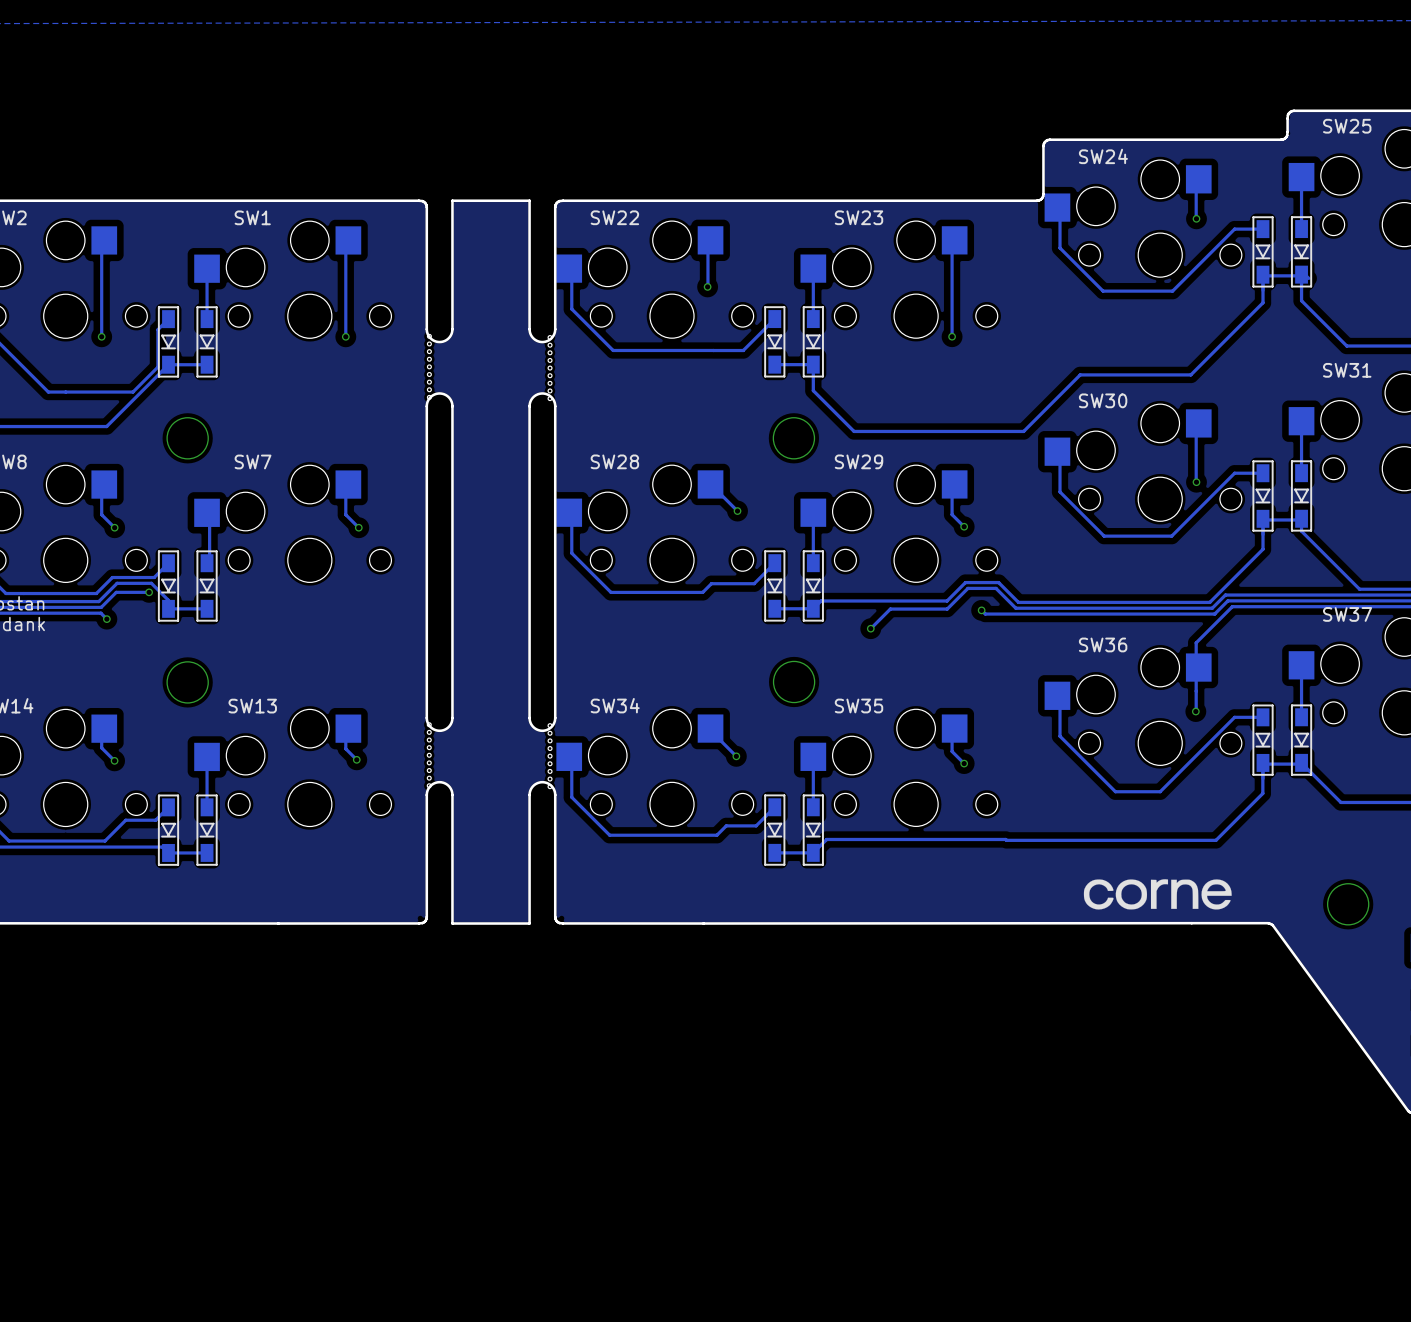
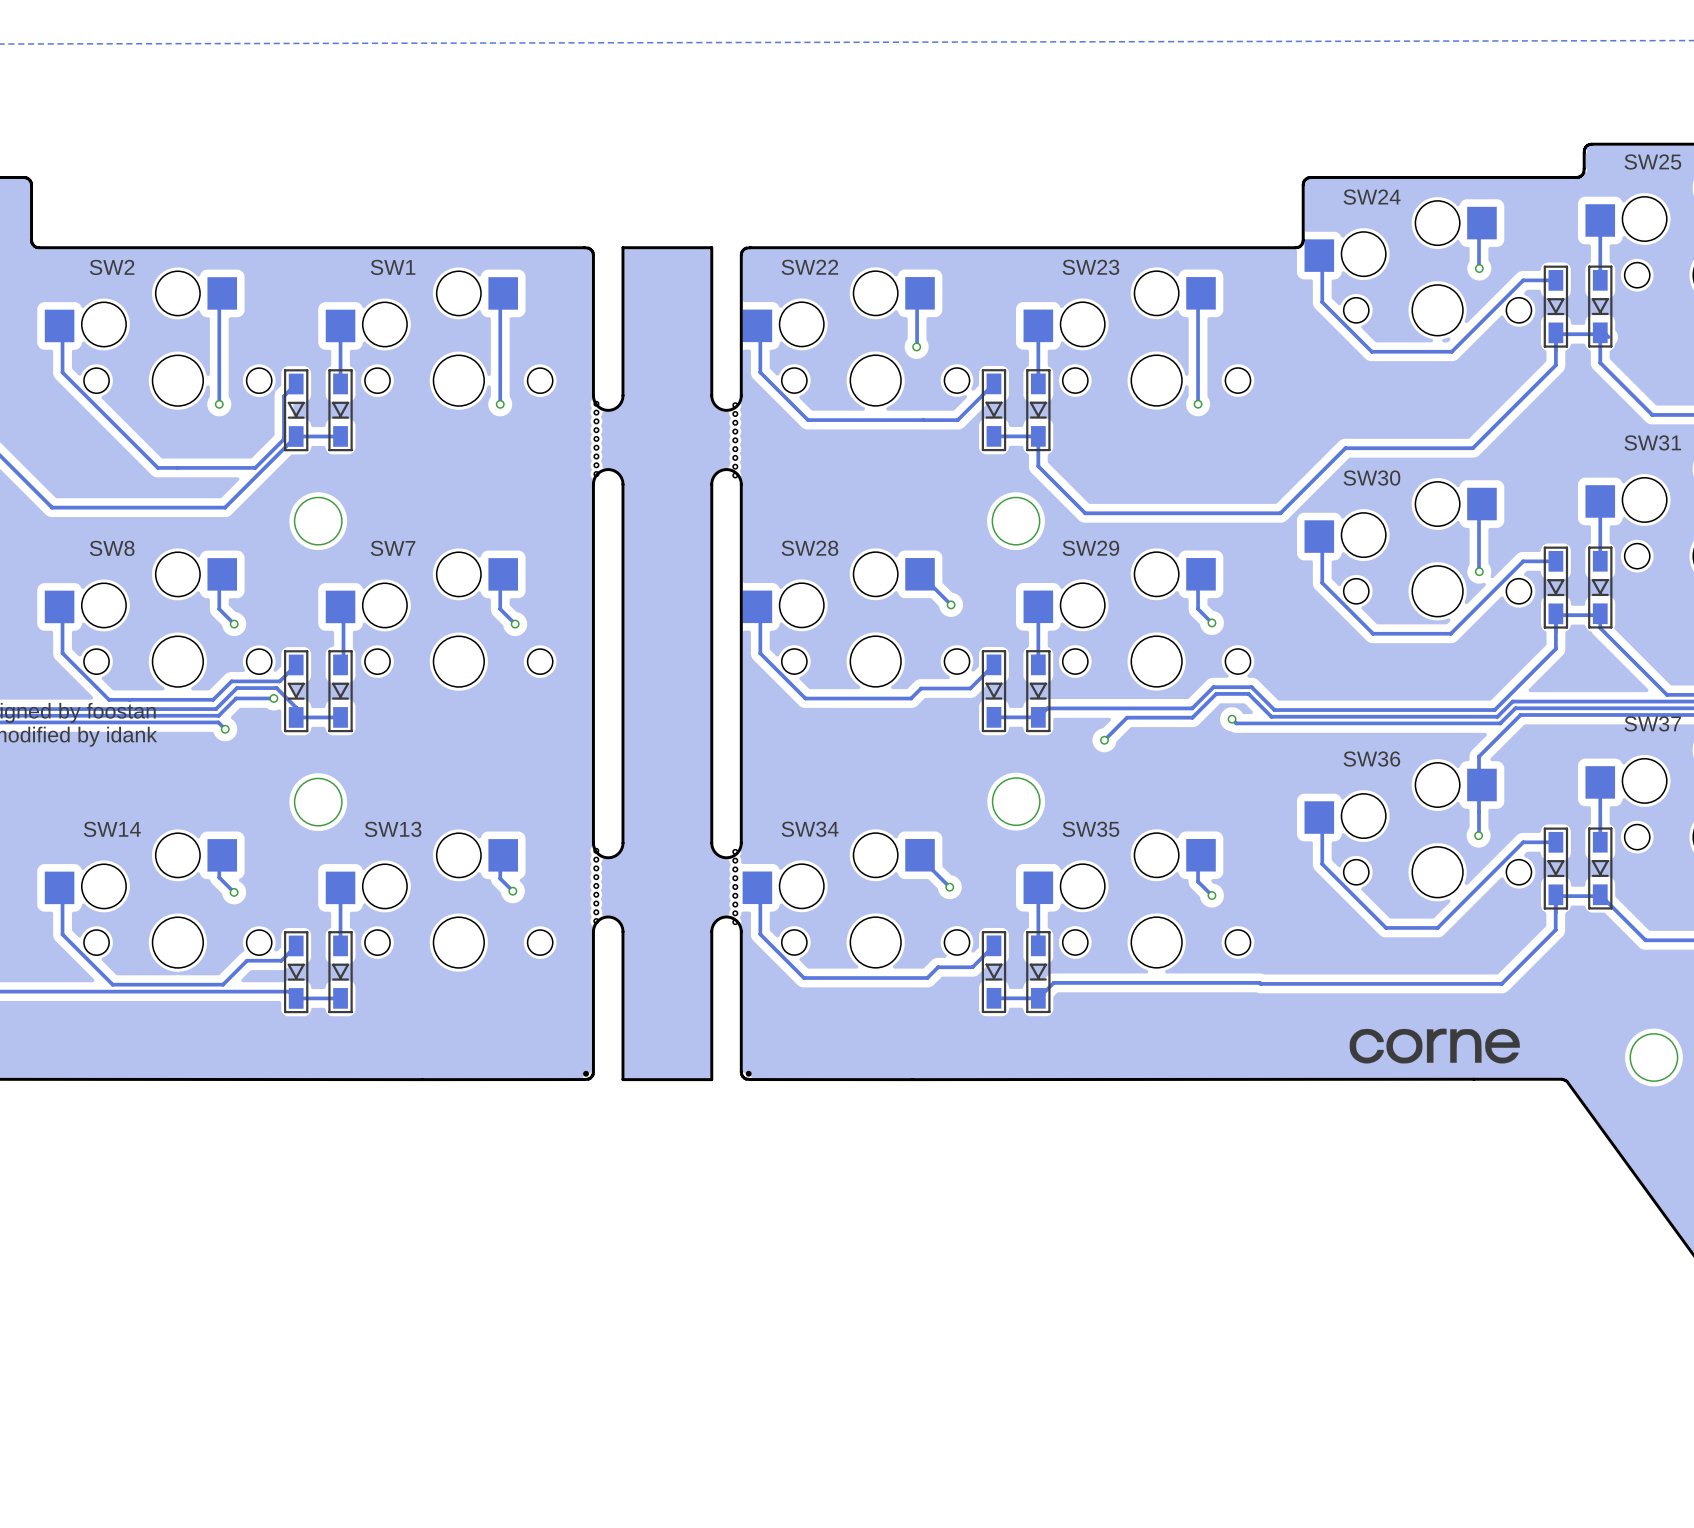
round board edge: none -> [583, 1070, 589, 1077]
round board edge: none -> [745, 1070, 752, 1077]

